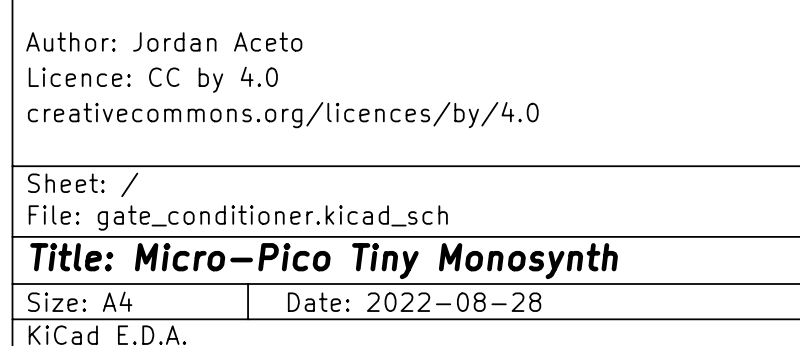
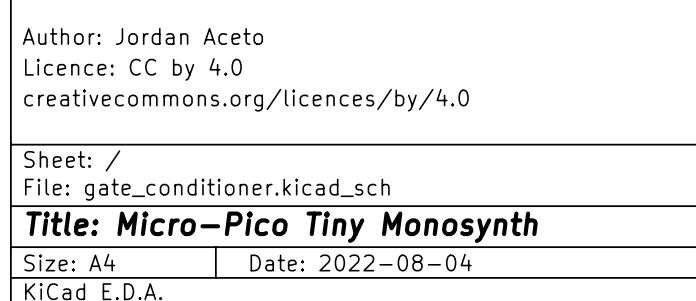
title block: Date: 2022-08-28 (414, 302) -> Date: 2022-08-04 (361, 262)

